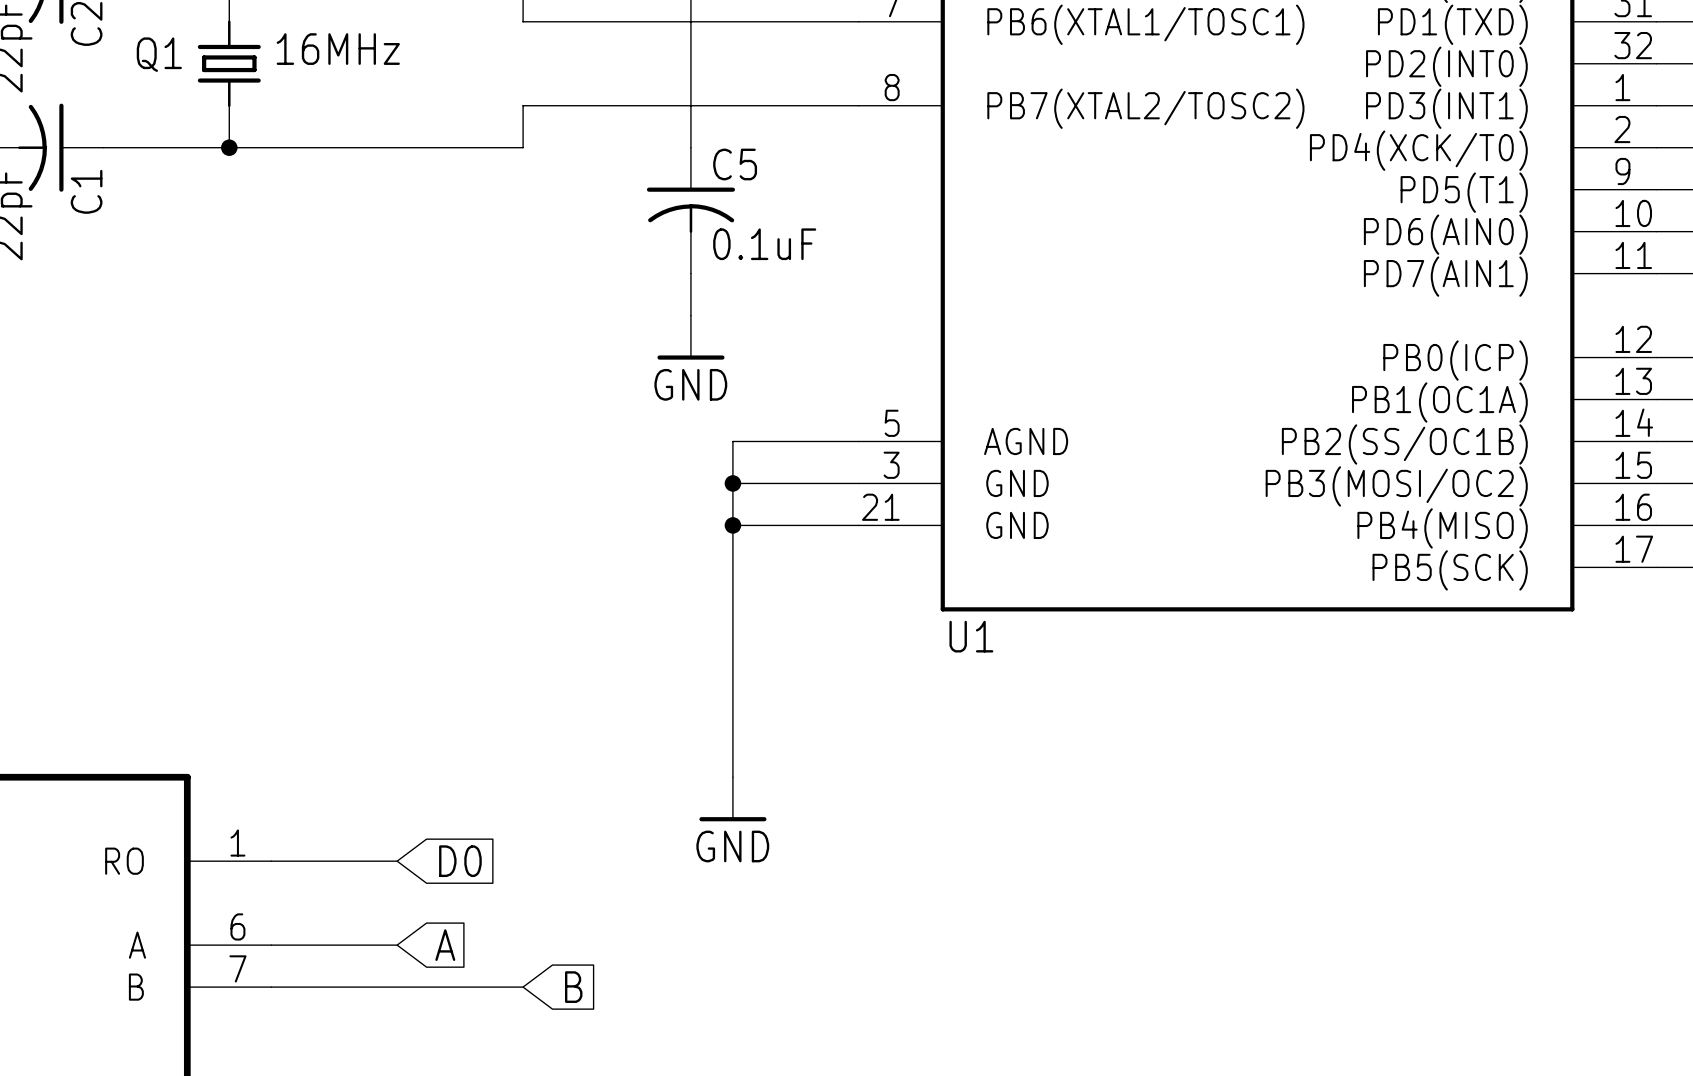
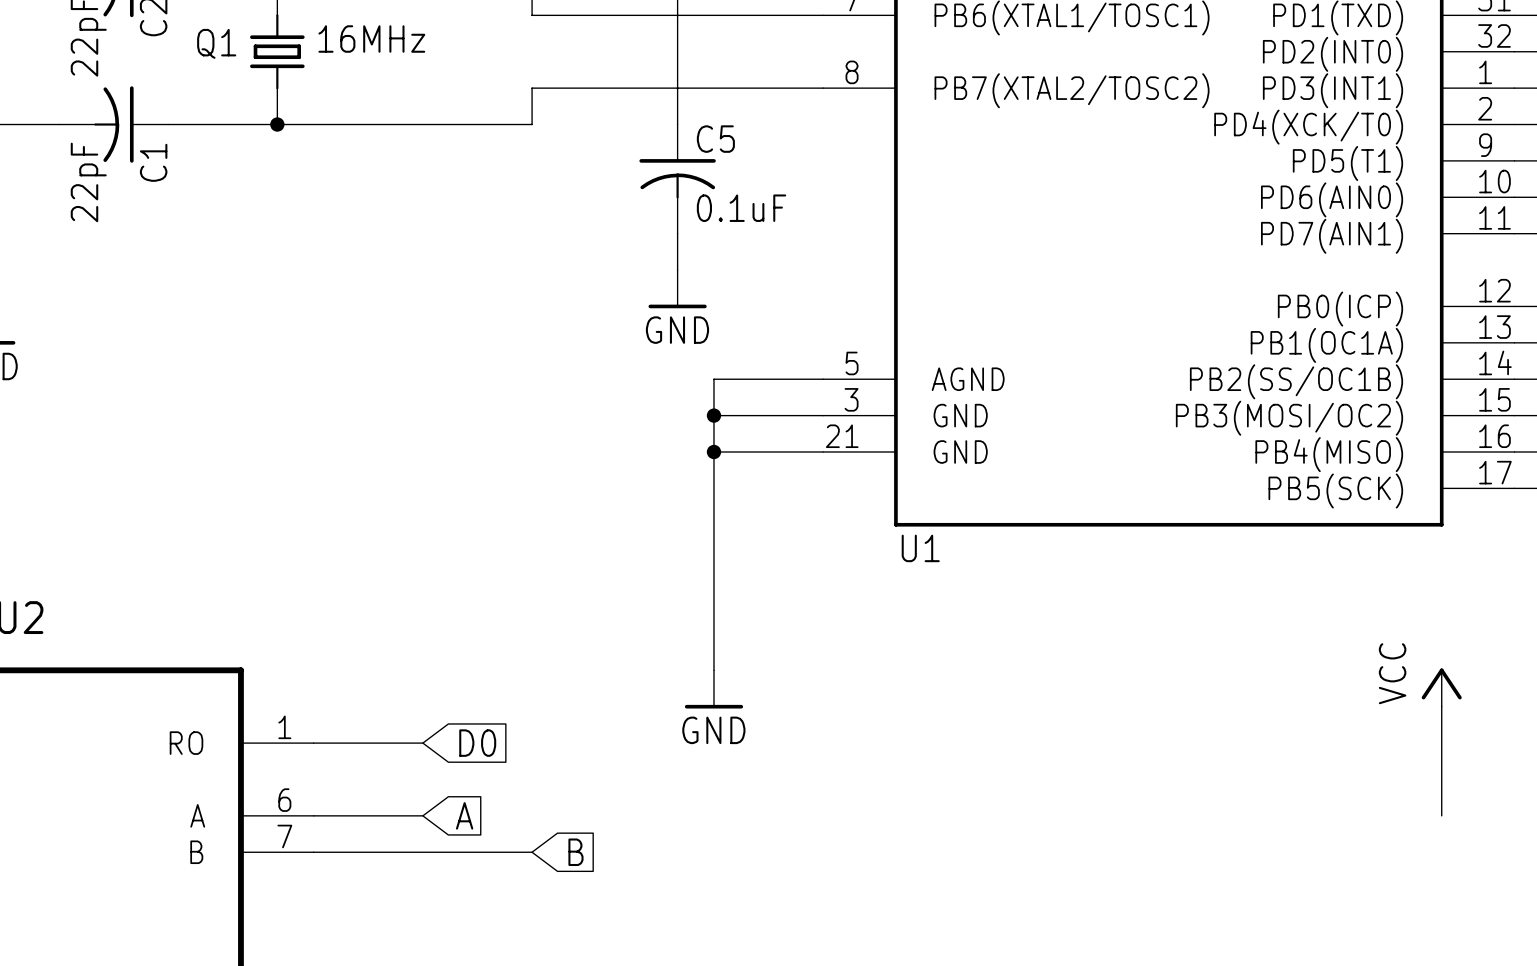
power symbol: none -> VCC (1441, 687)
wire: none -> (1441, 706) (1441, 815)

